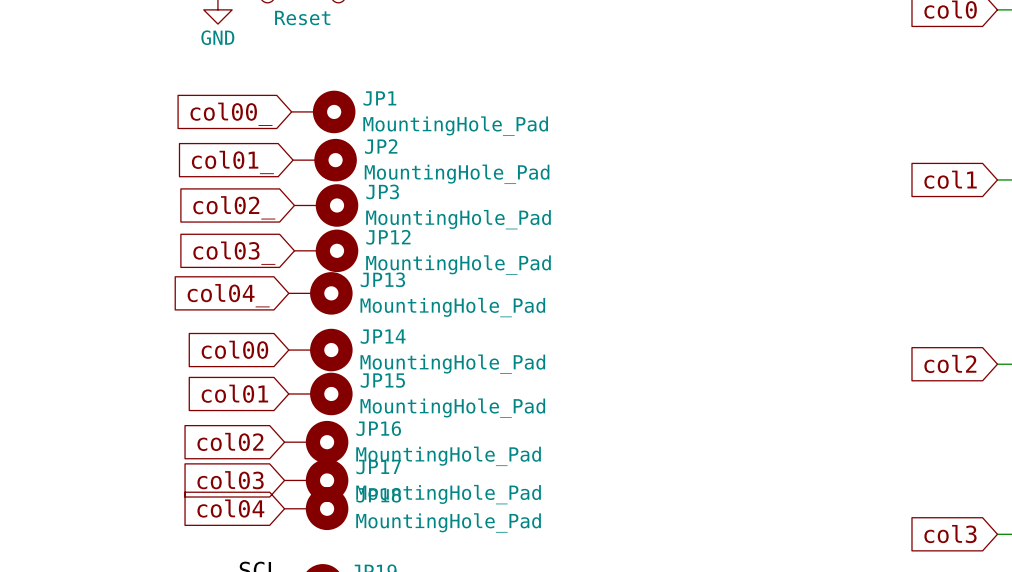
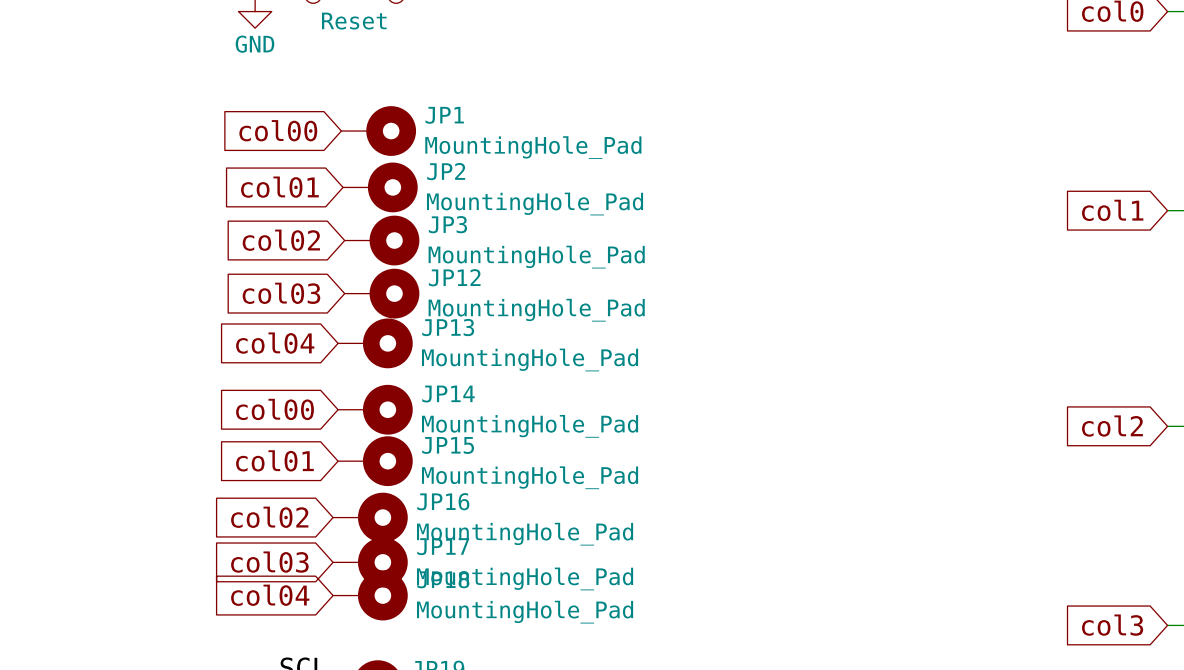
global label: col00_ (231, 114) -> col00 (278, 130)
global label: col01_ (232, 162) -> col01 (279, 187)
global label: col02_ (234, 207) -> col02 (281, 240)
global label: col03_ (234, 253) -> col03 (281, 293)
global label: col04_ (228, 295) -> col04 (275, 343)

